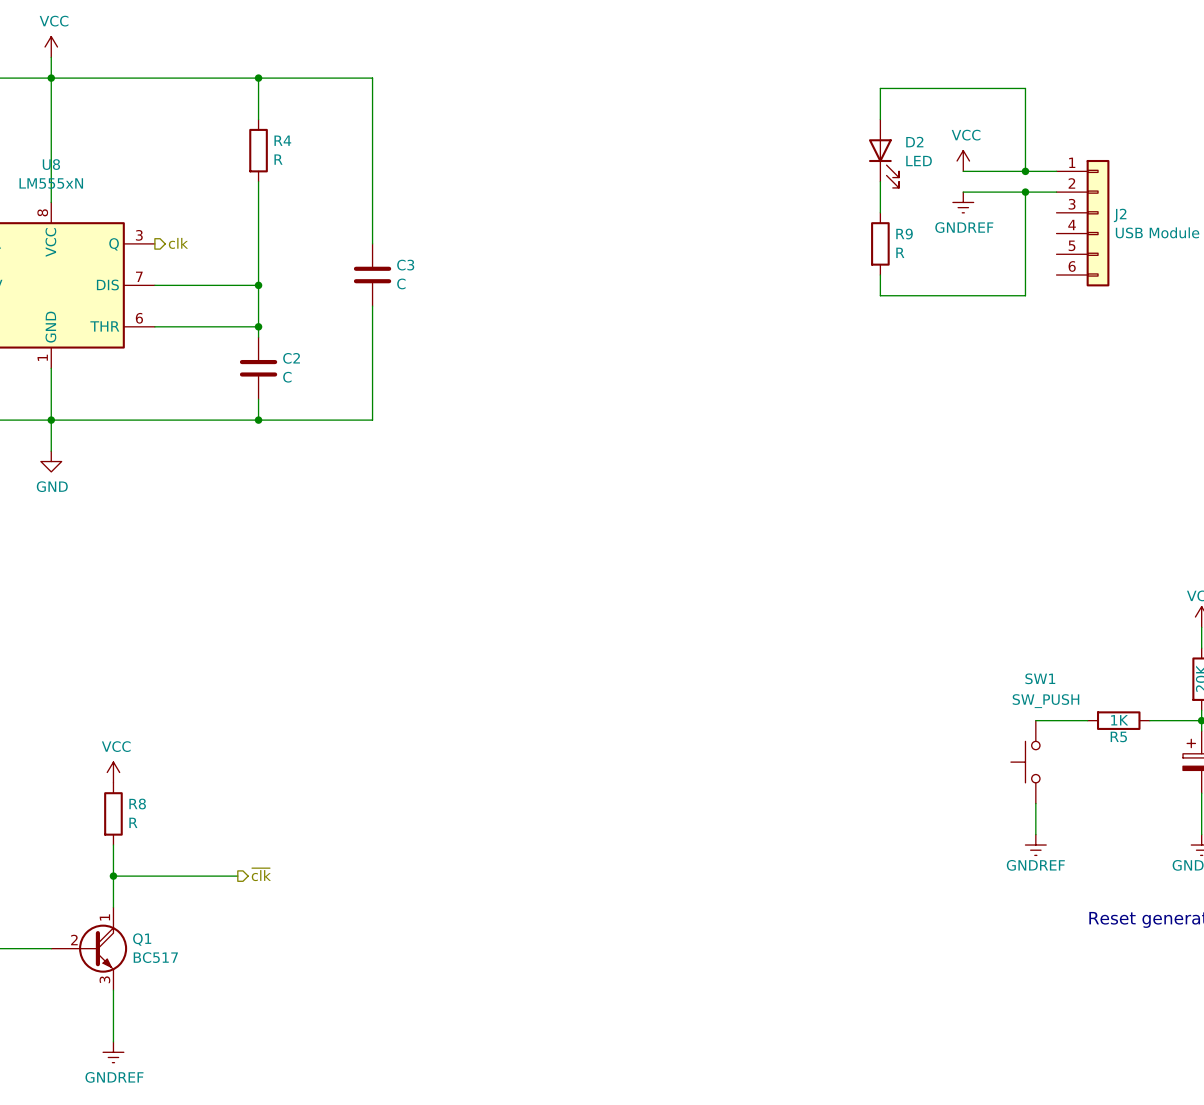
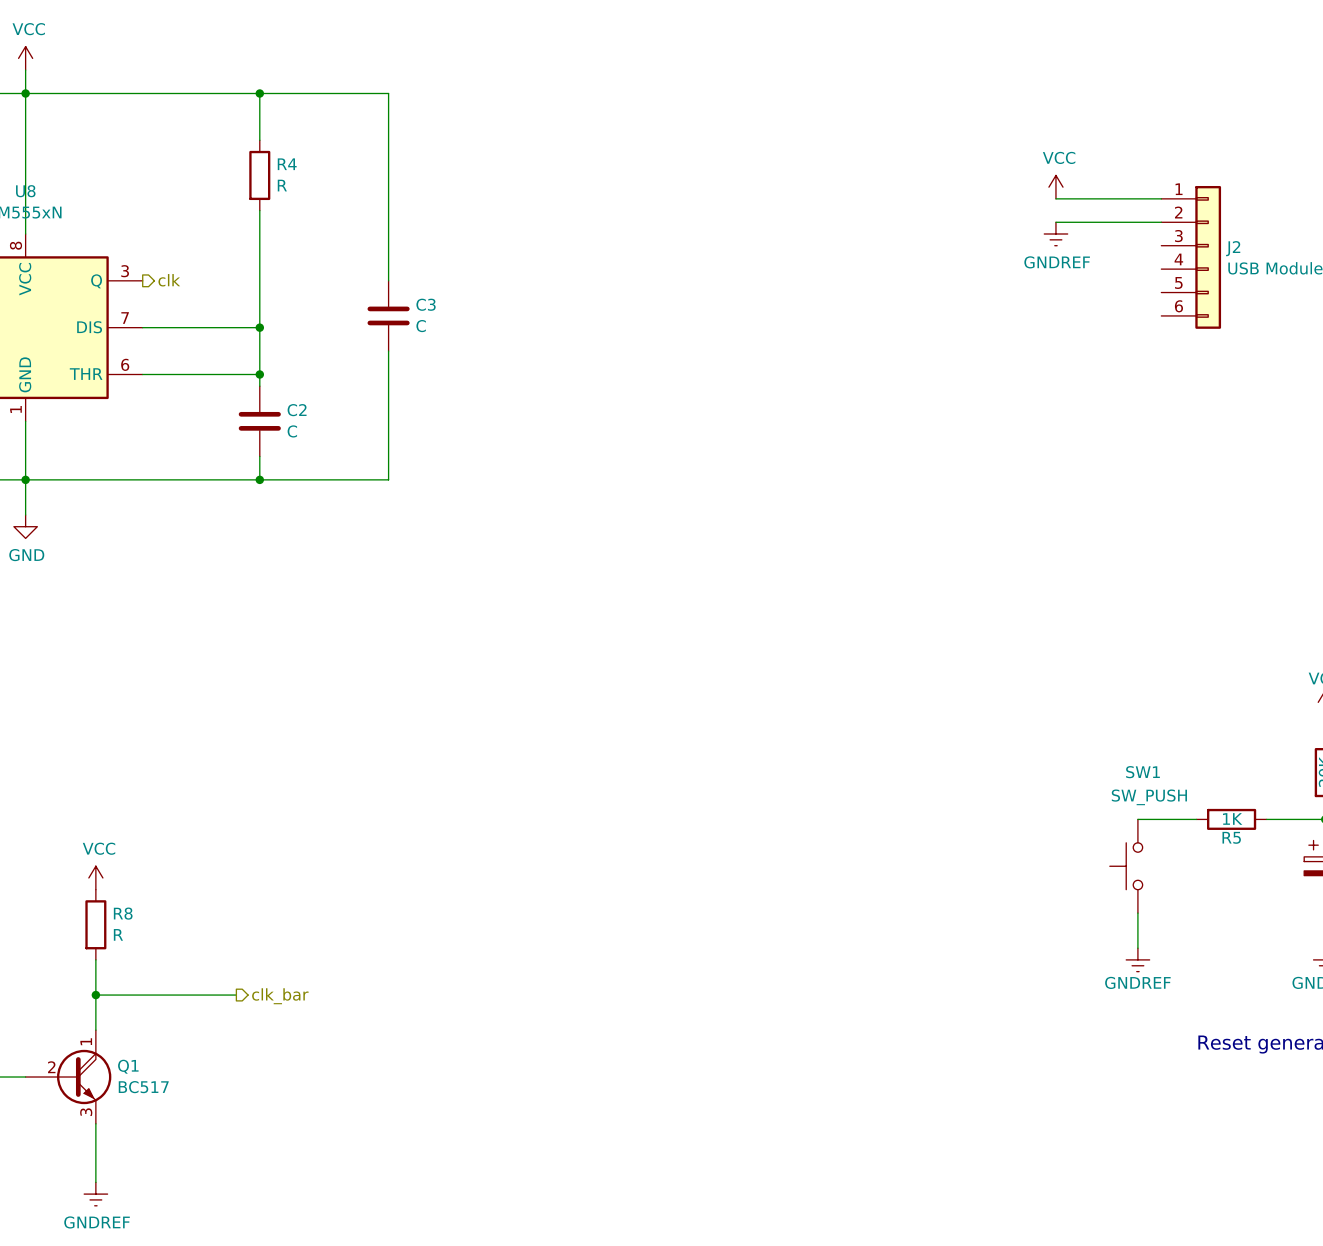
wire: (880, 119) (880, 88) (1025, 88) (1025, 171) -> none
D2: LED (884, 153) -> none
junction: (1025, 171) -> none
wire: (880, 181) (880, 212) -> none
wire: (1025, 192) (1025, 295) (880, 295) (880, 275) -> none
junction: (1025, 192) -> none
R9: R (880, 243) -> none
hierarchical label: ~{clk} (261, 874) -> clk_bar (280, 996)

